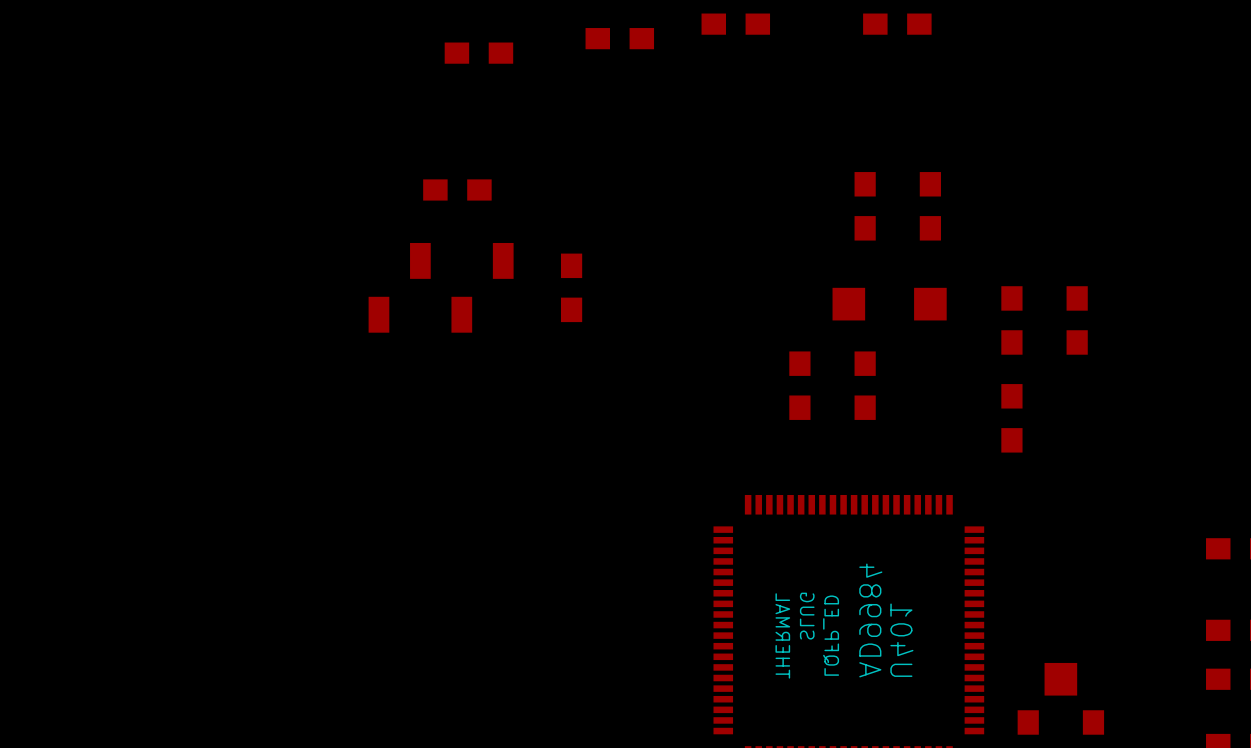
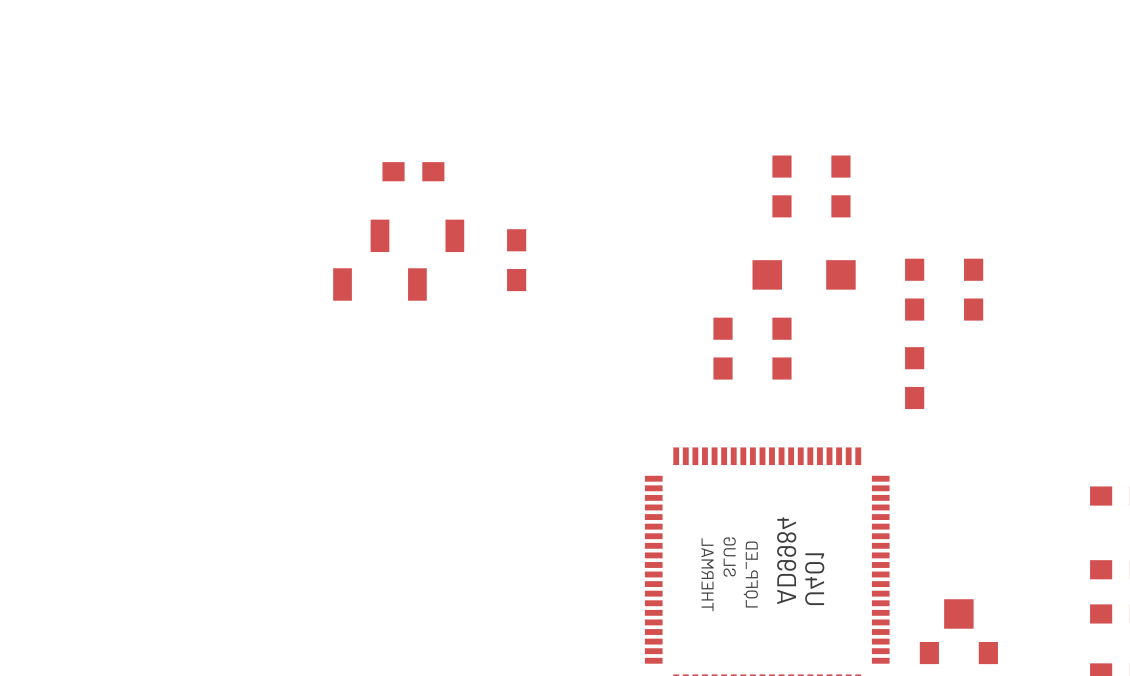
part: (735, 24) -> none
part: (897, 24) -> none
part: (619, 38) -> none
part: (478, 53) -> none

